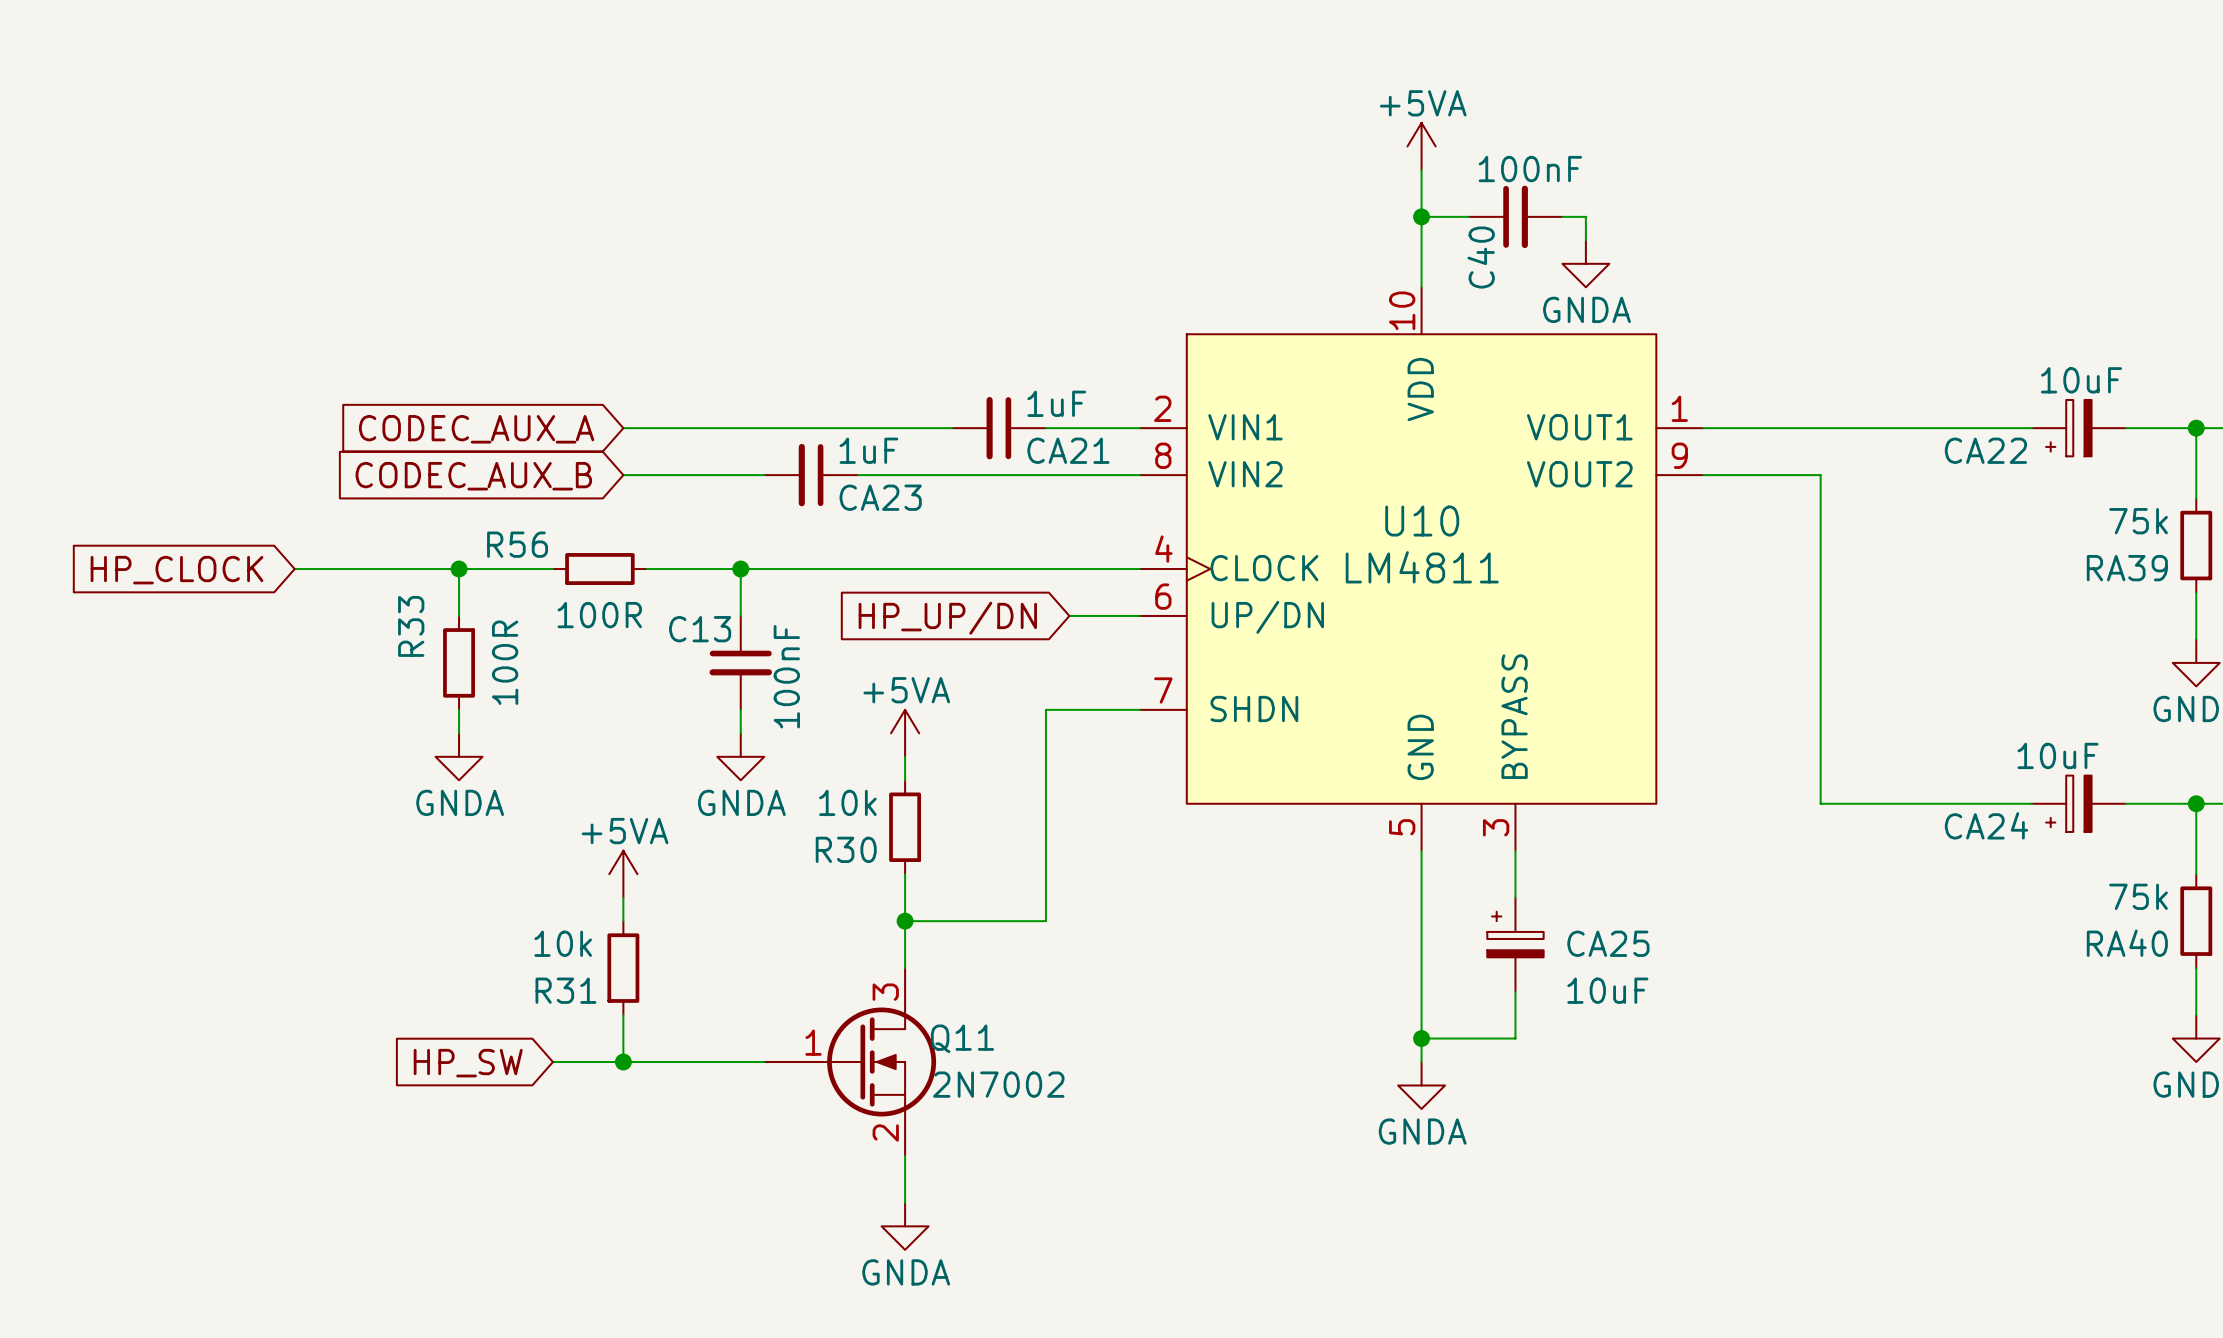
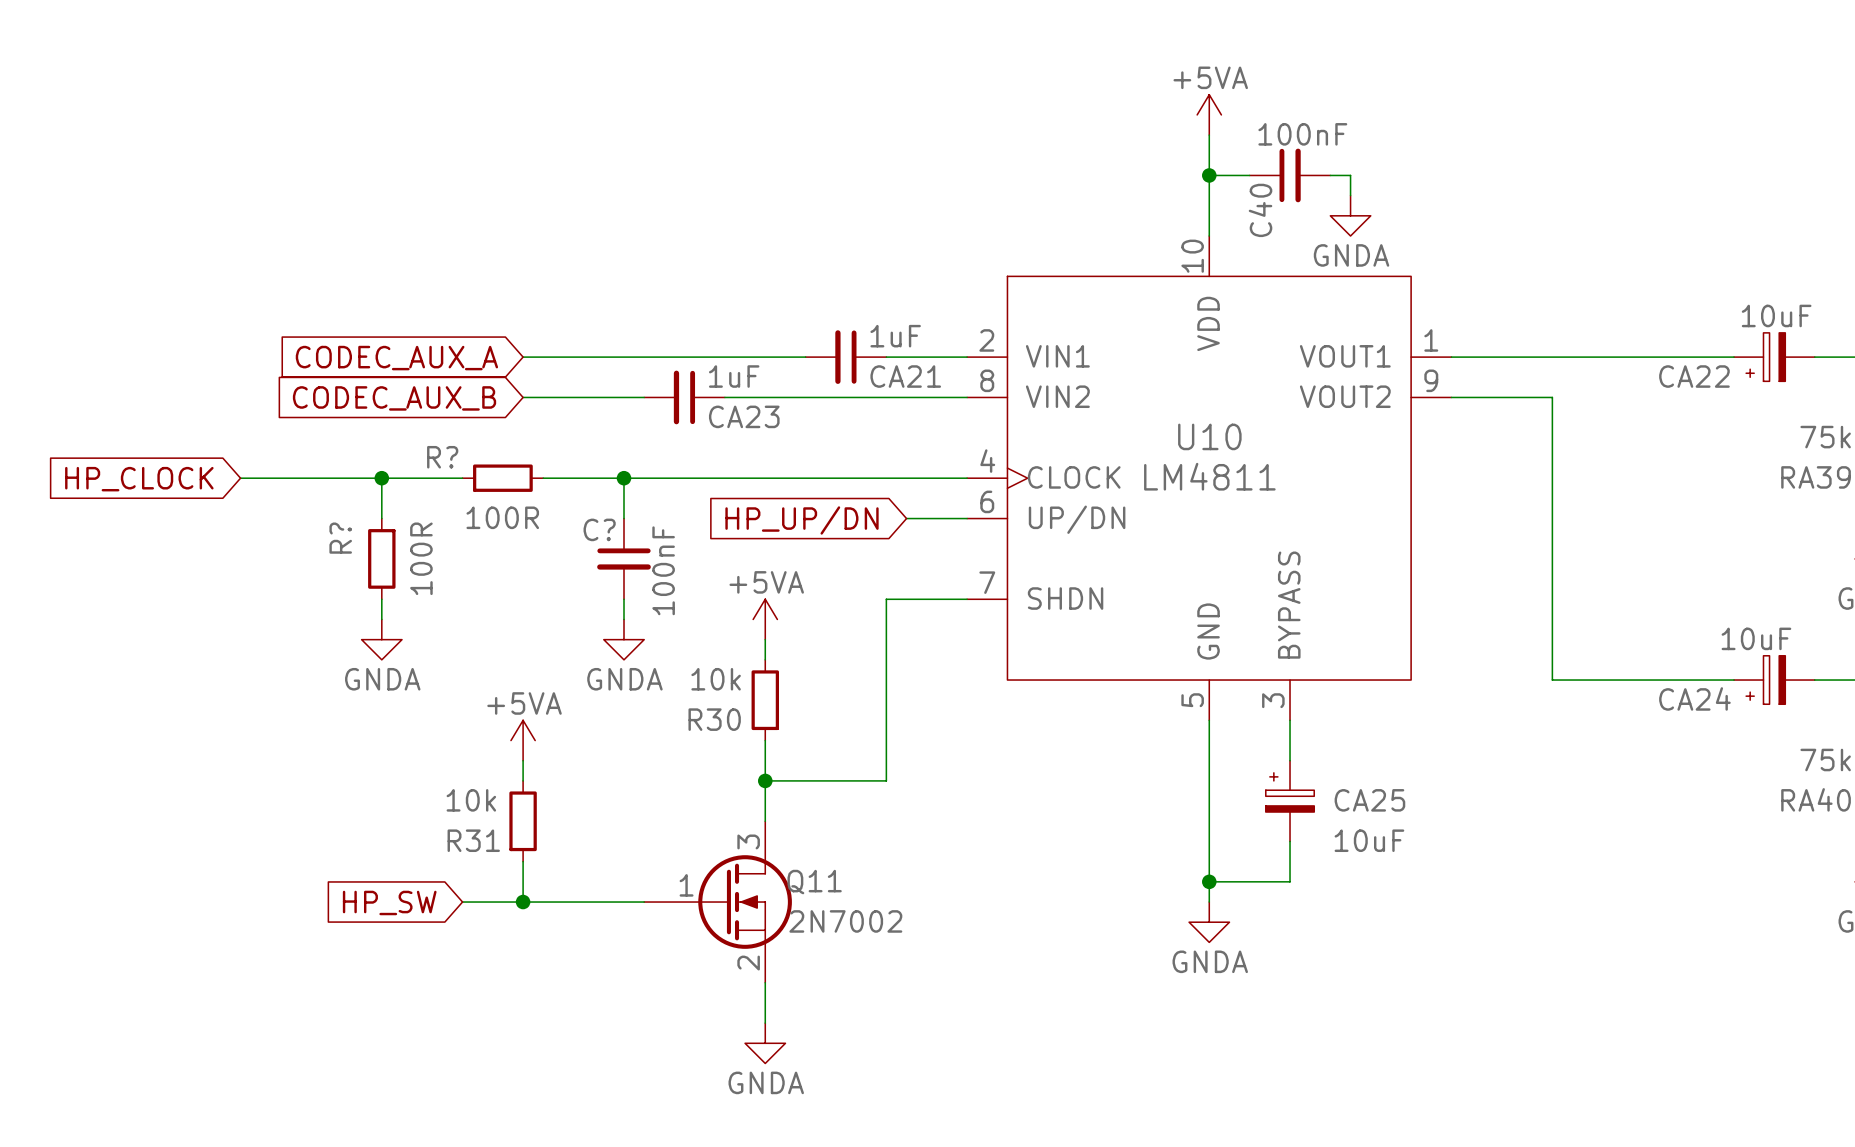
R56 name: R56 (517, 544) -> R? (442, 457)
R33 name: R33 (411, 626) -> R? (340, 538)
C13 name: C13 (700, 629) -> C? (599, 529)

